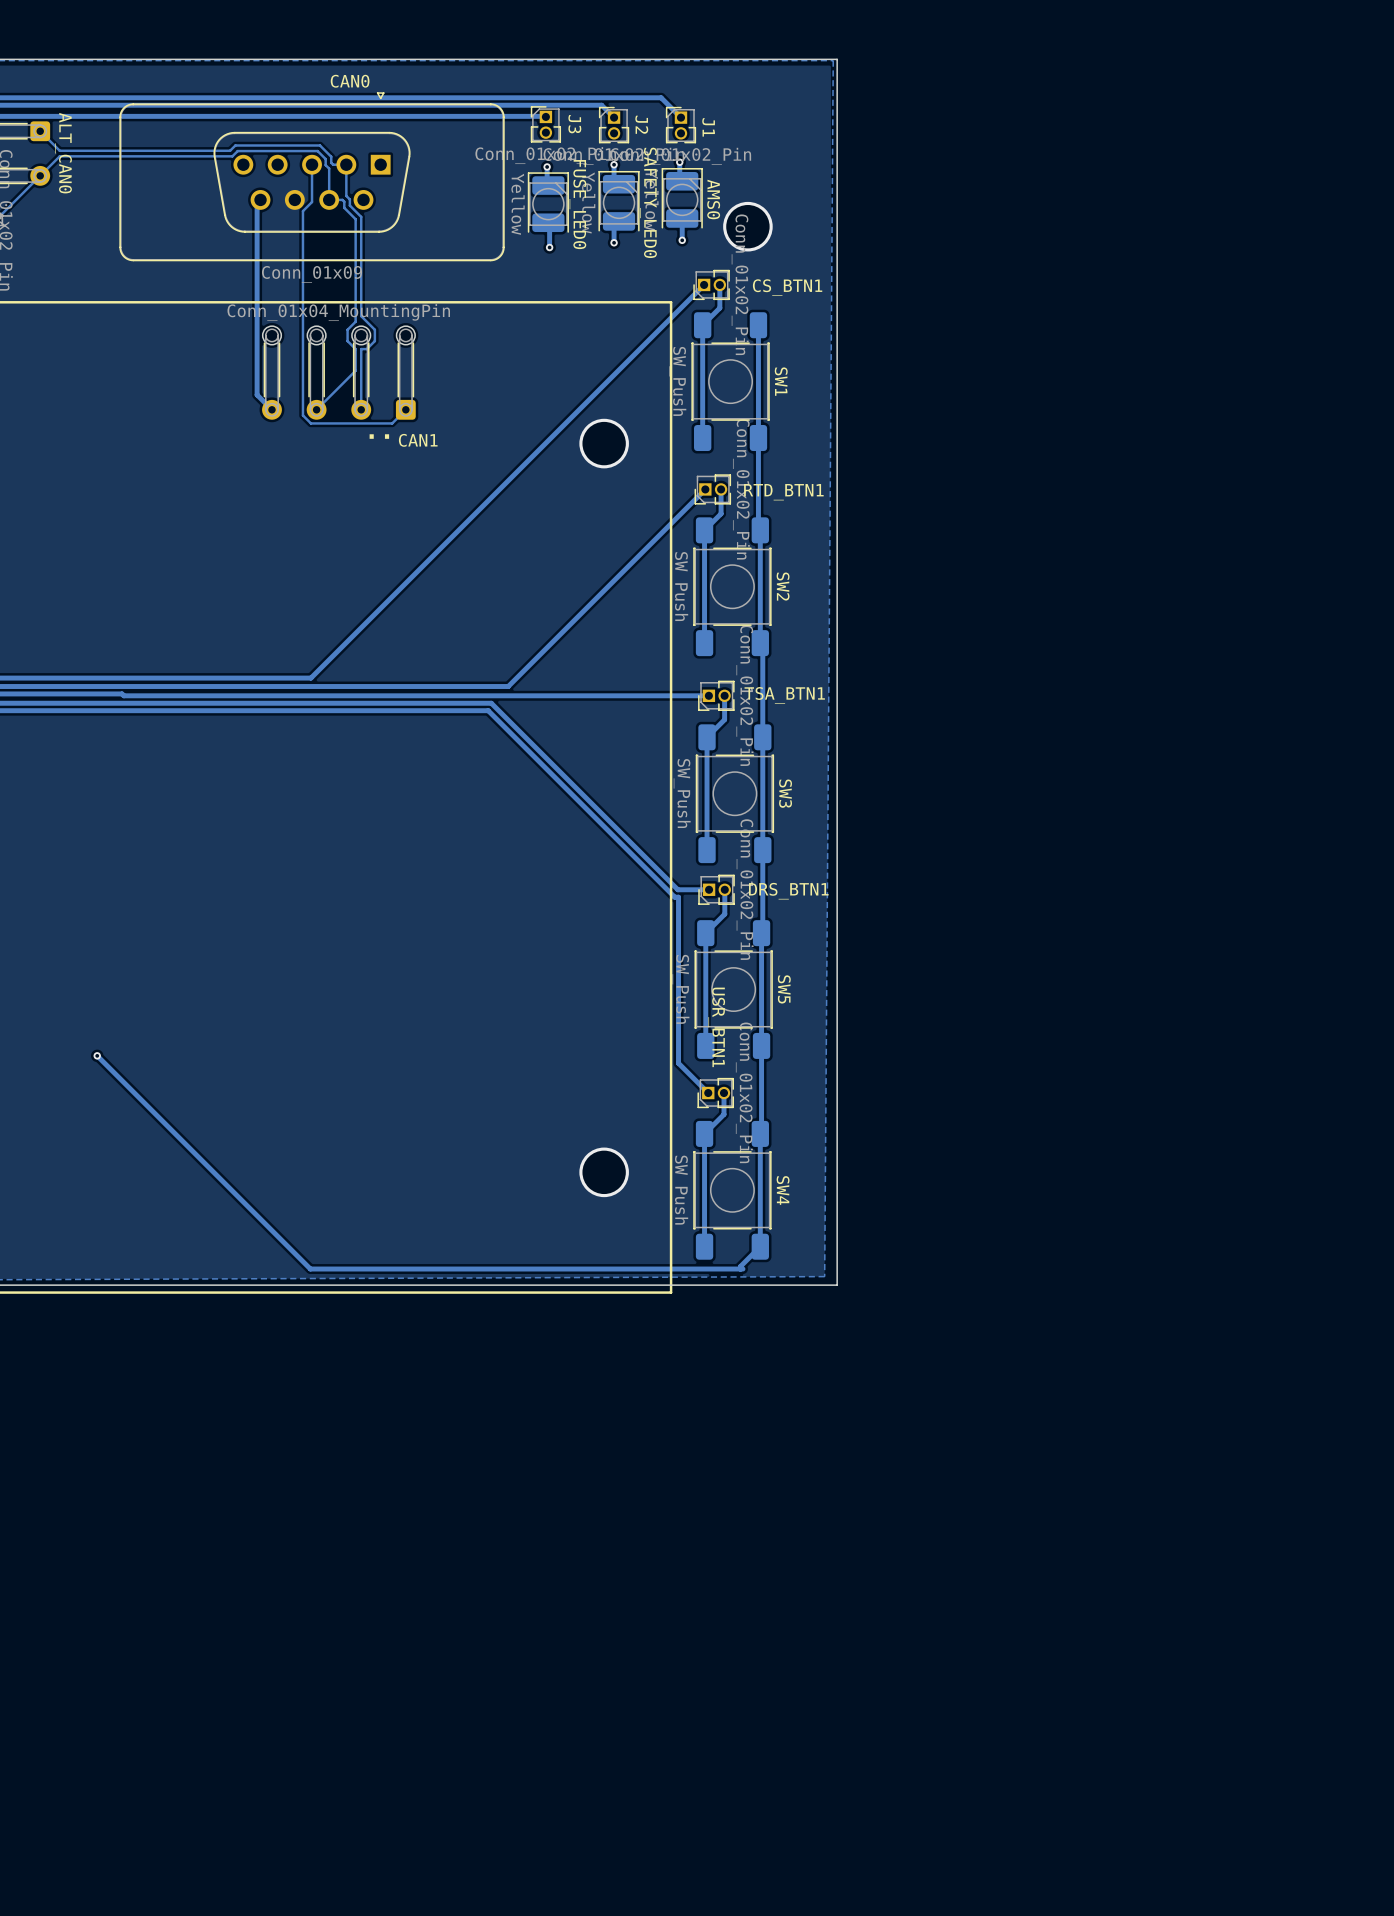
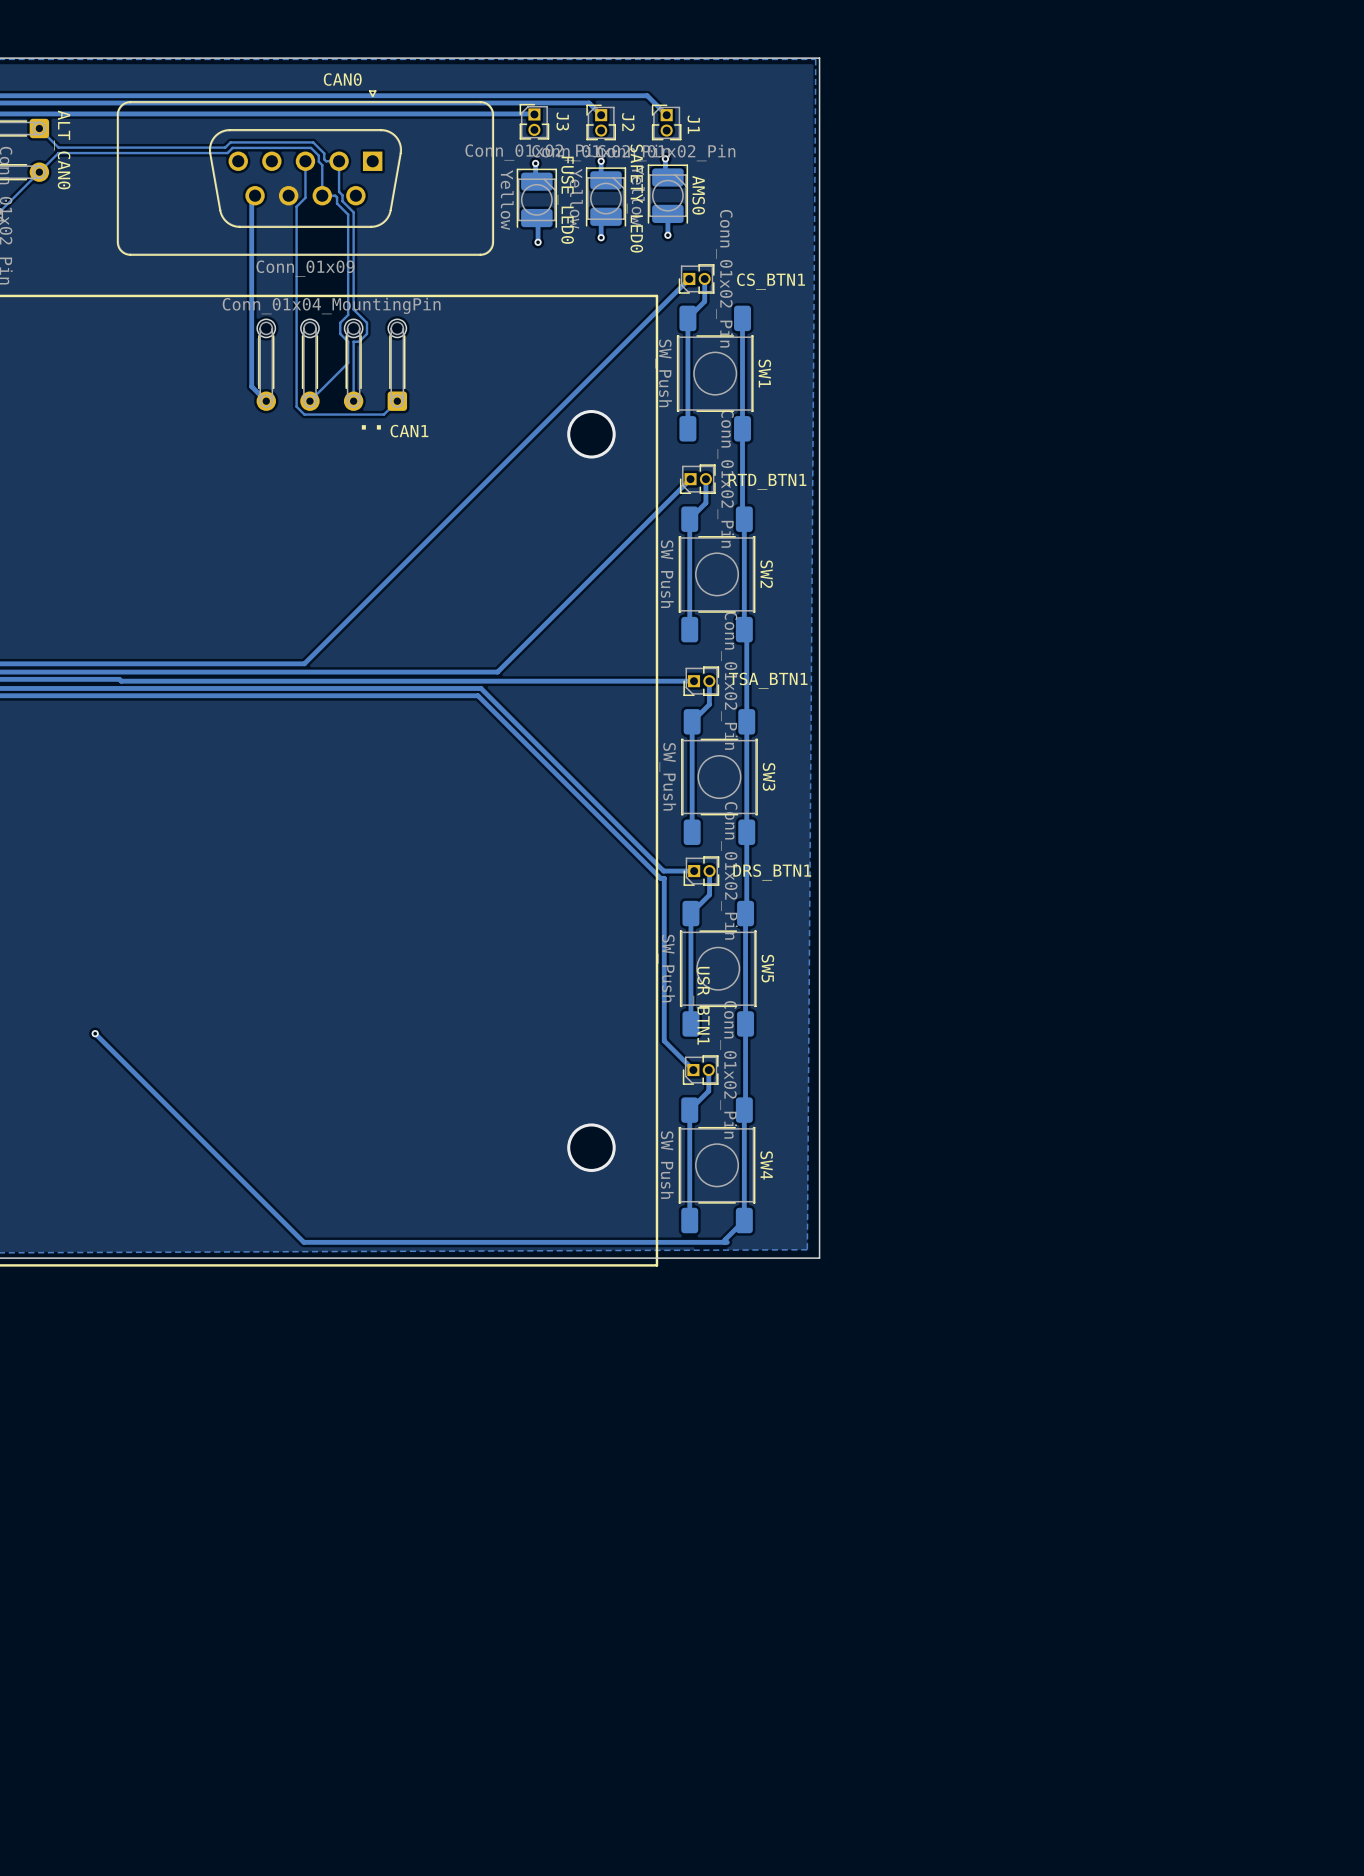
via: (747, 226) -> none

